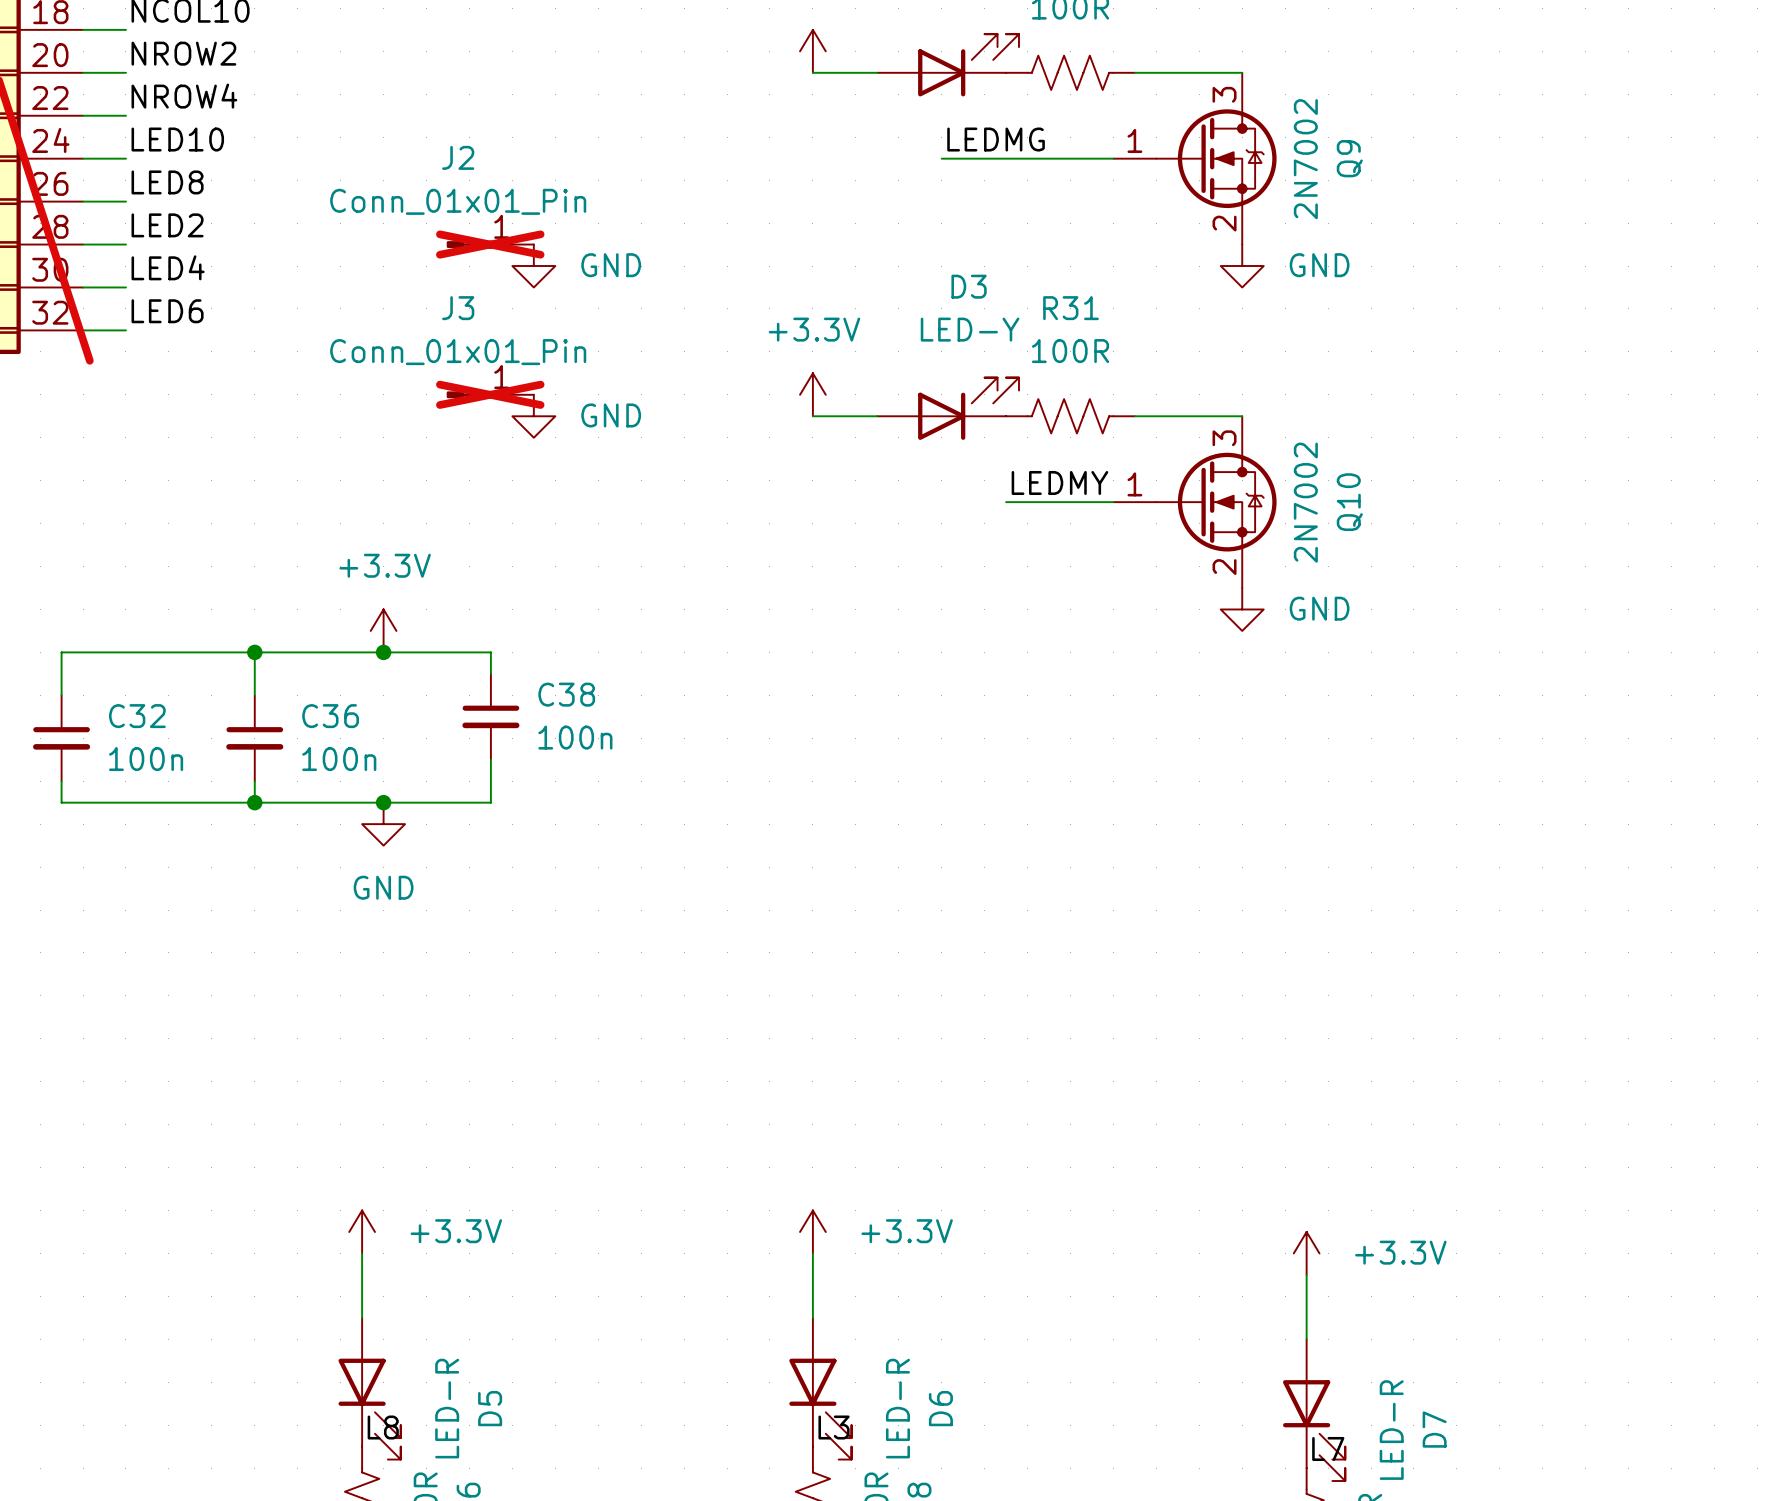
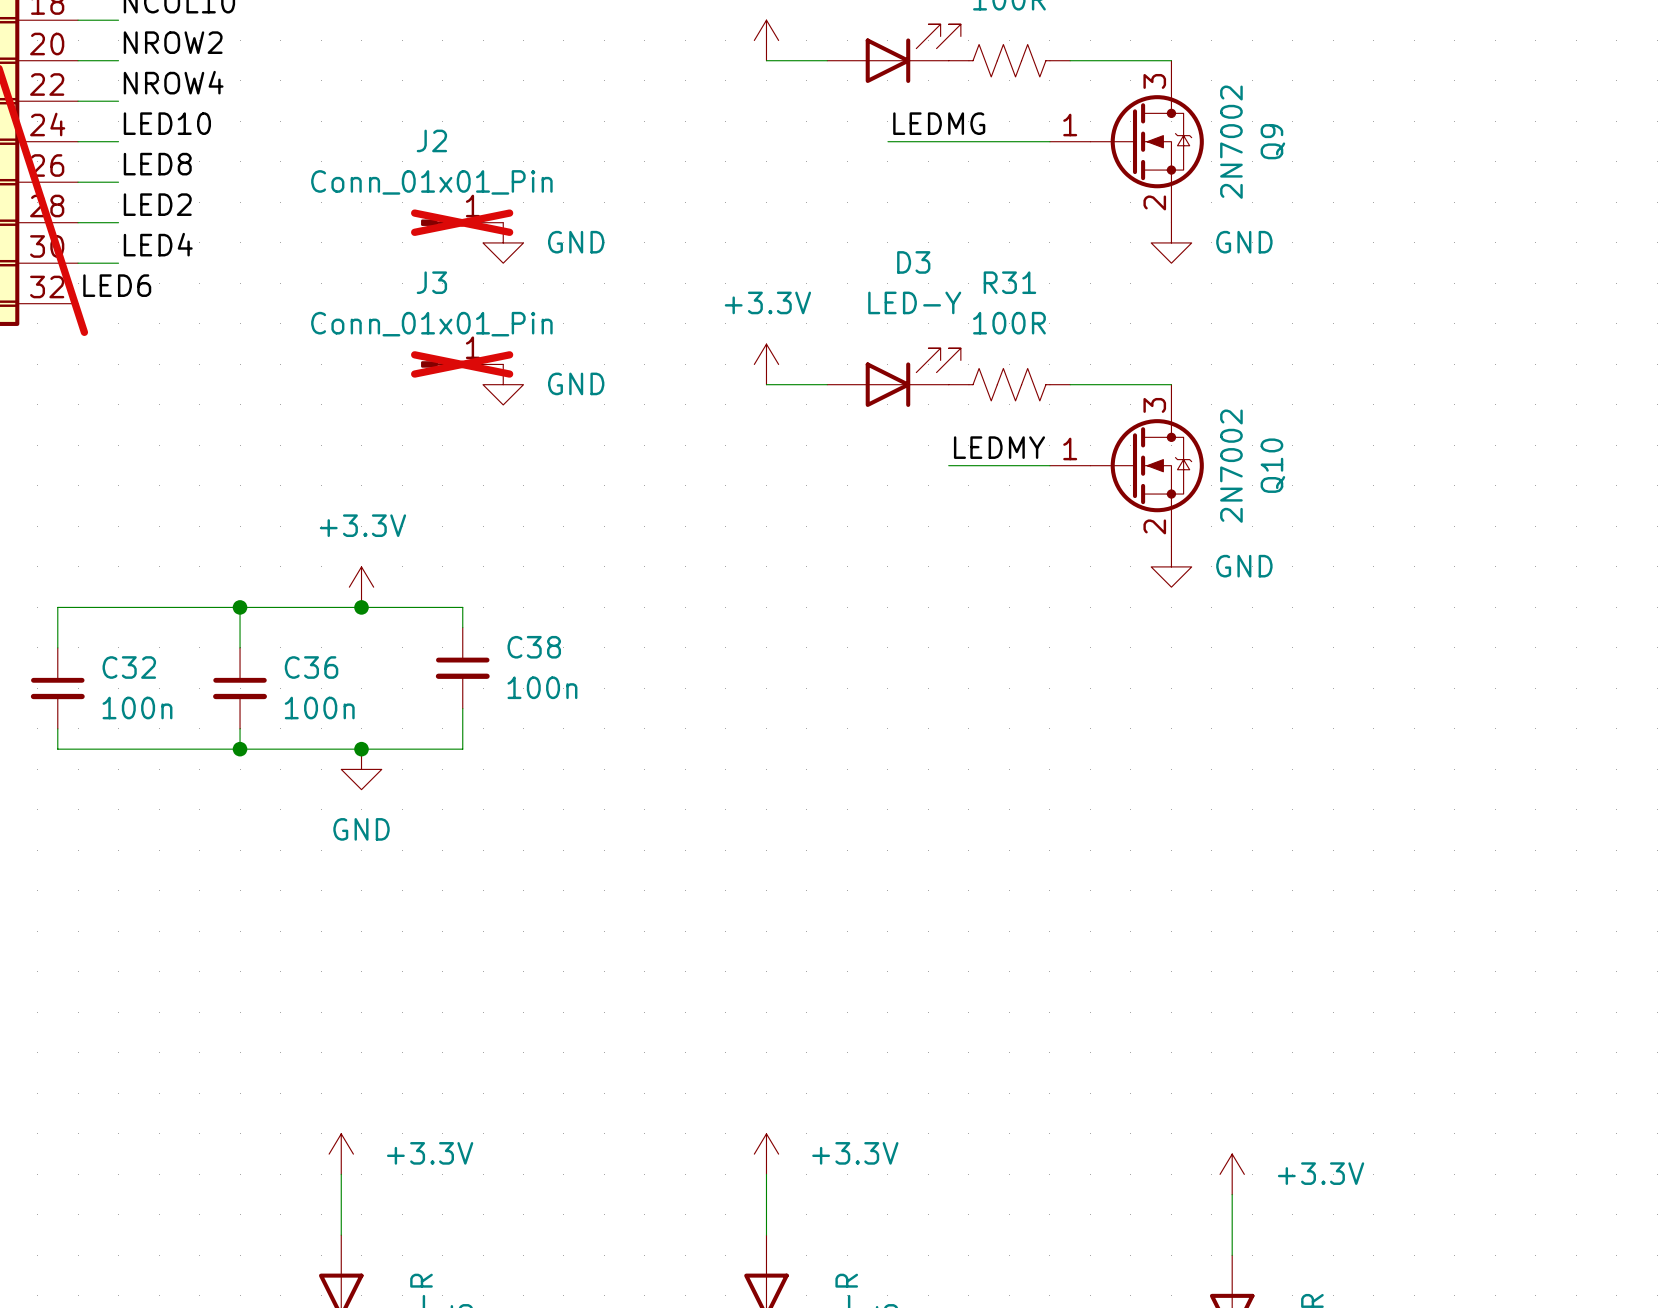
label position: LED6 (167, 311) -> LED6 (117, 285)
wire: (83, 330) (125, 330) -> none

